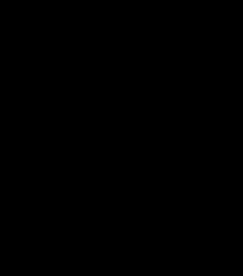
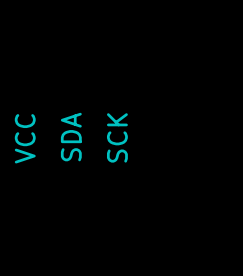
text: none -> SDA (71, 137)
text: none -> SCK (117, 137)
text: none -> VCC (25, 138)

